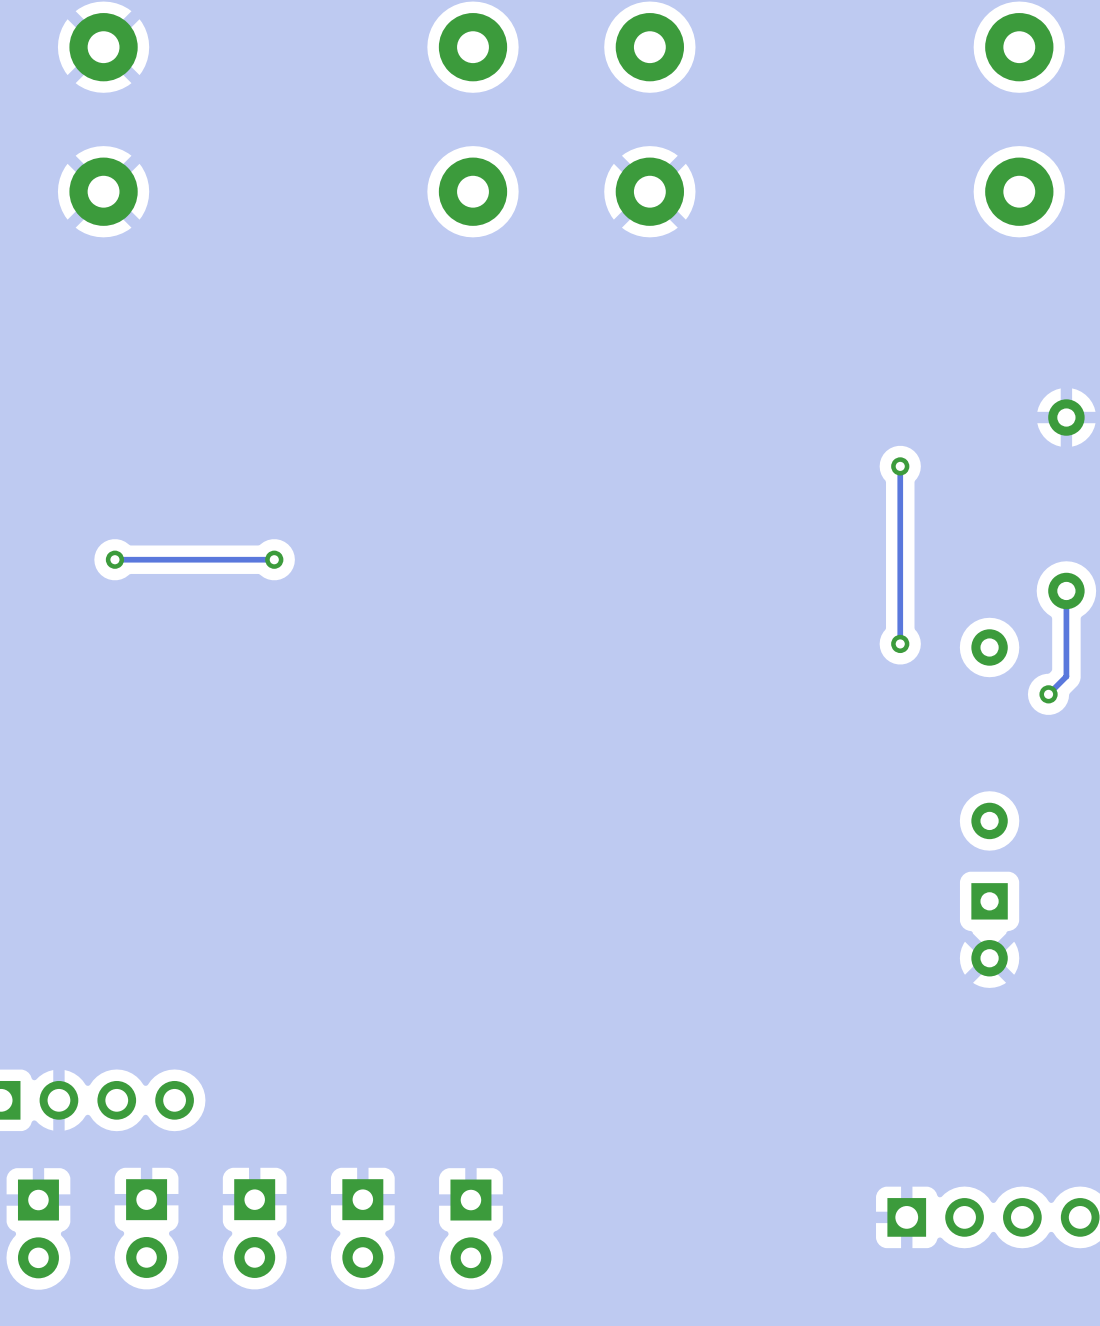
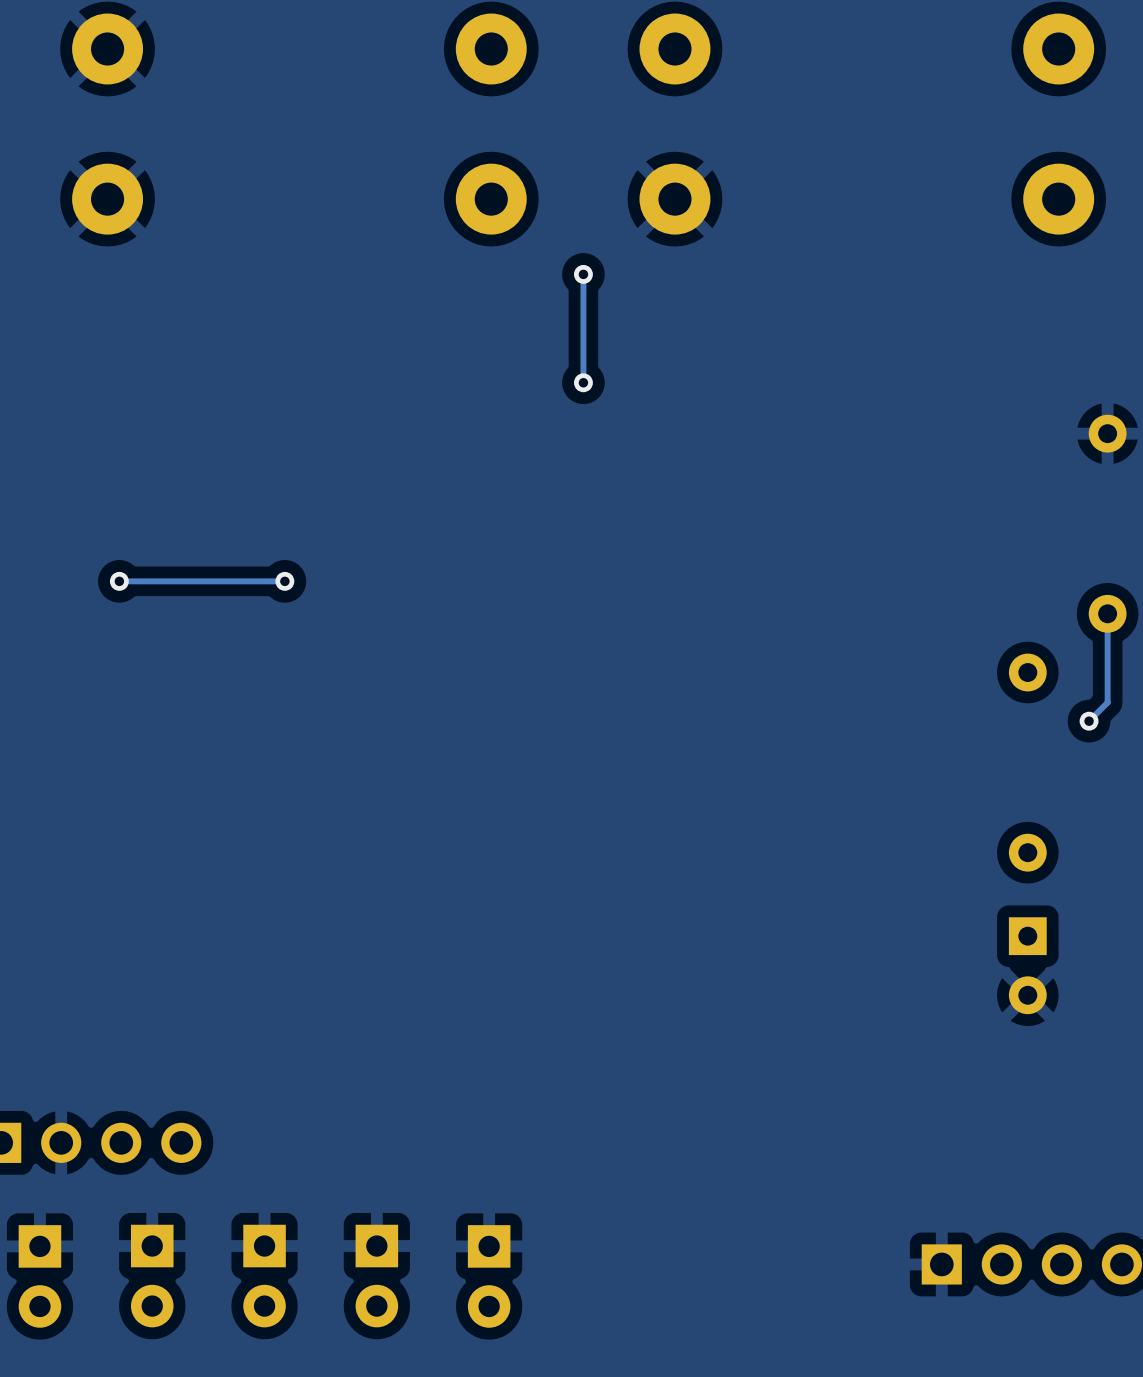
track: none -> (583, 274) (583, 382)
via: none -> (583, 274)
via: none -> (583, 382)
track: (900, 466) (900, 643) -> none
via: (900, 466) -> none
via: (900, 643) -> none

